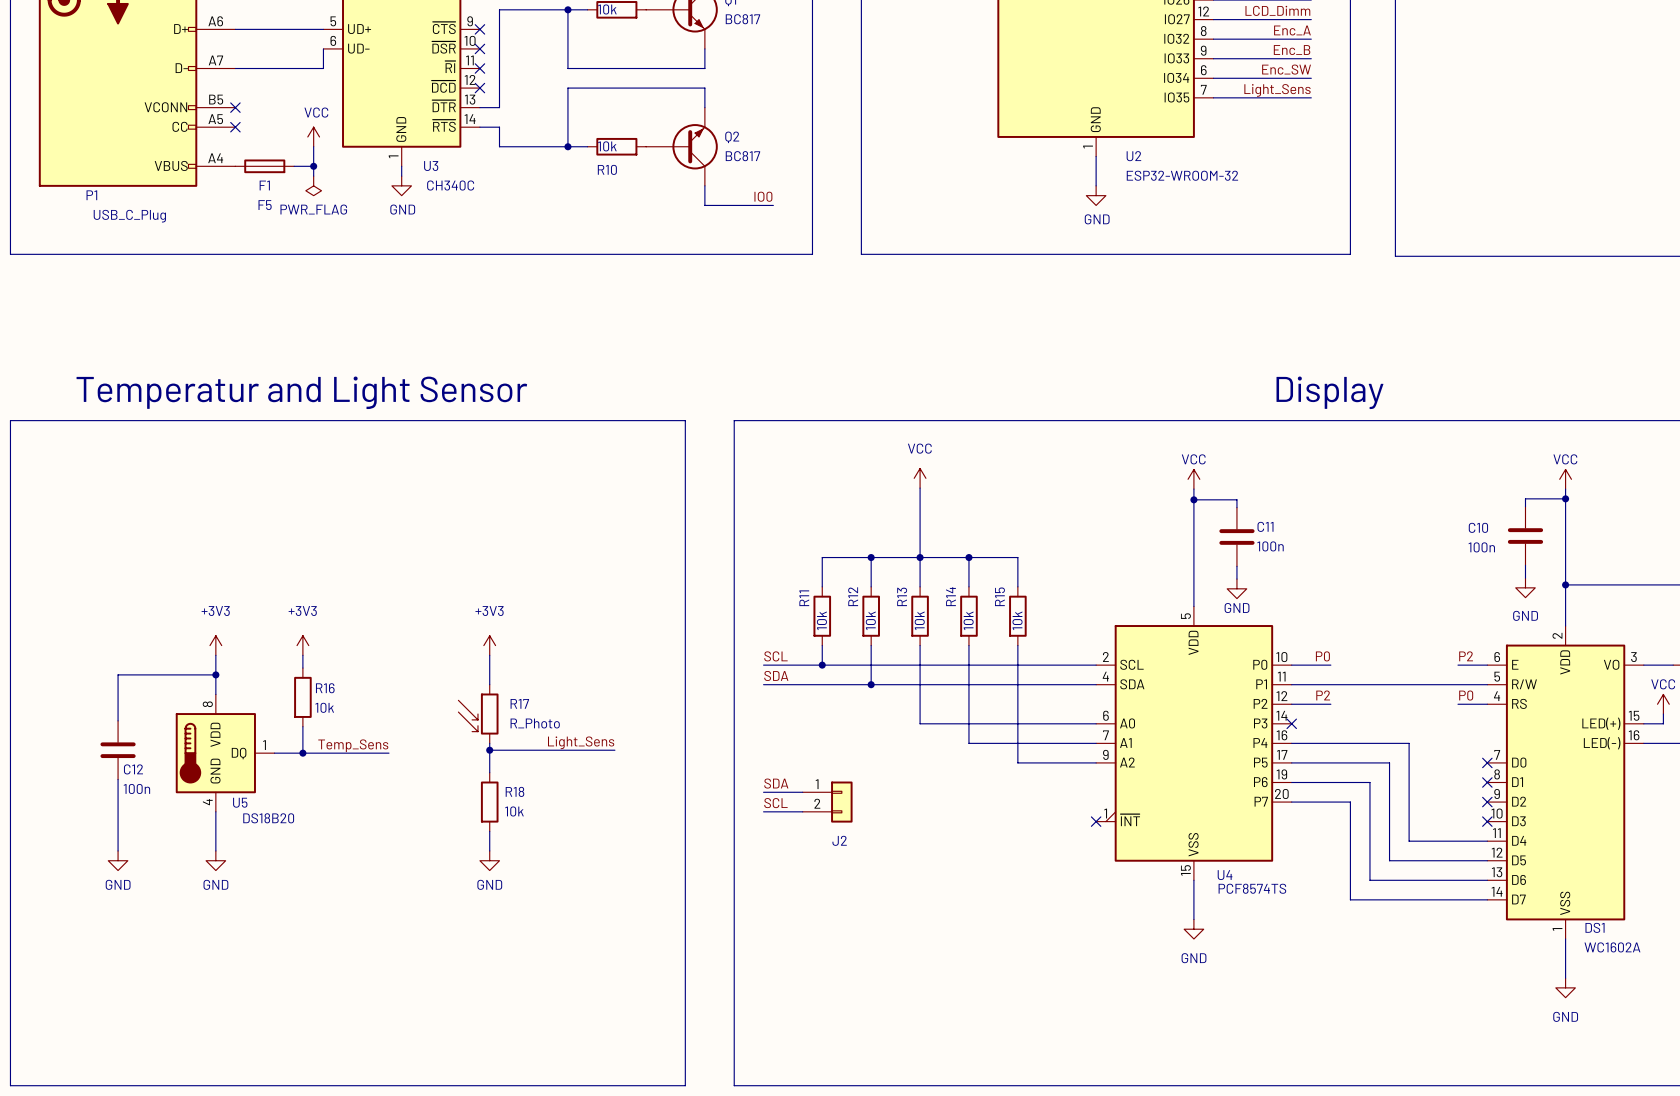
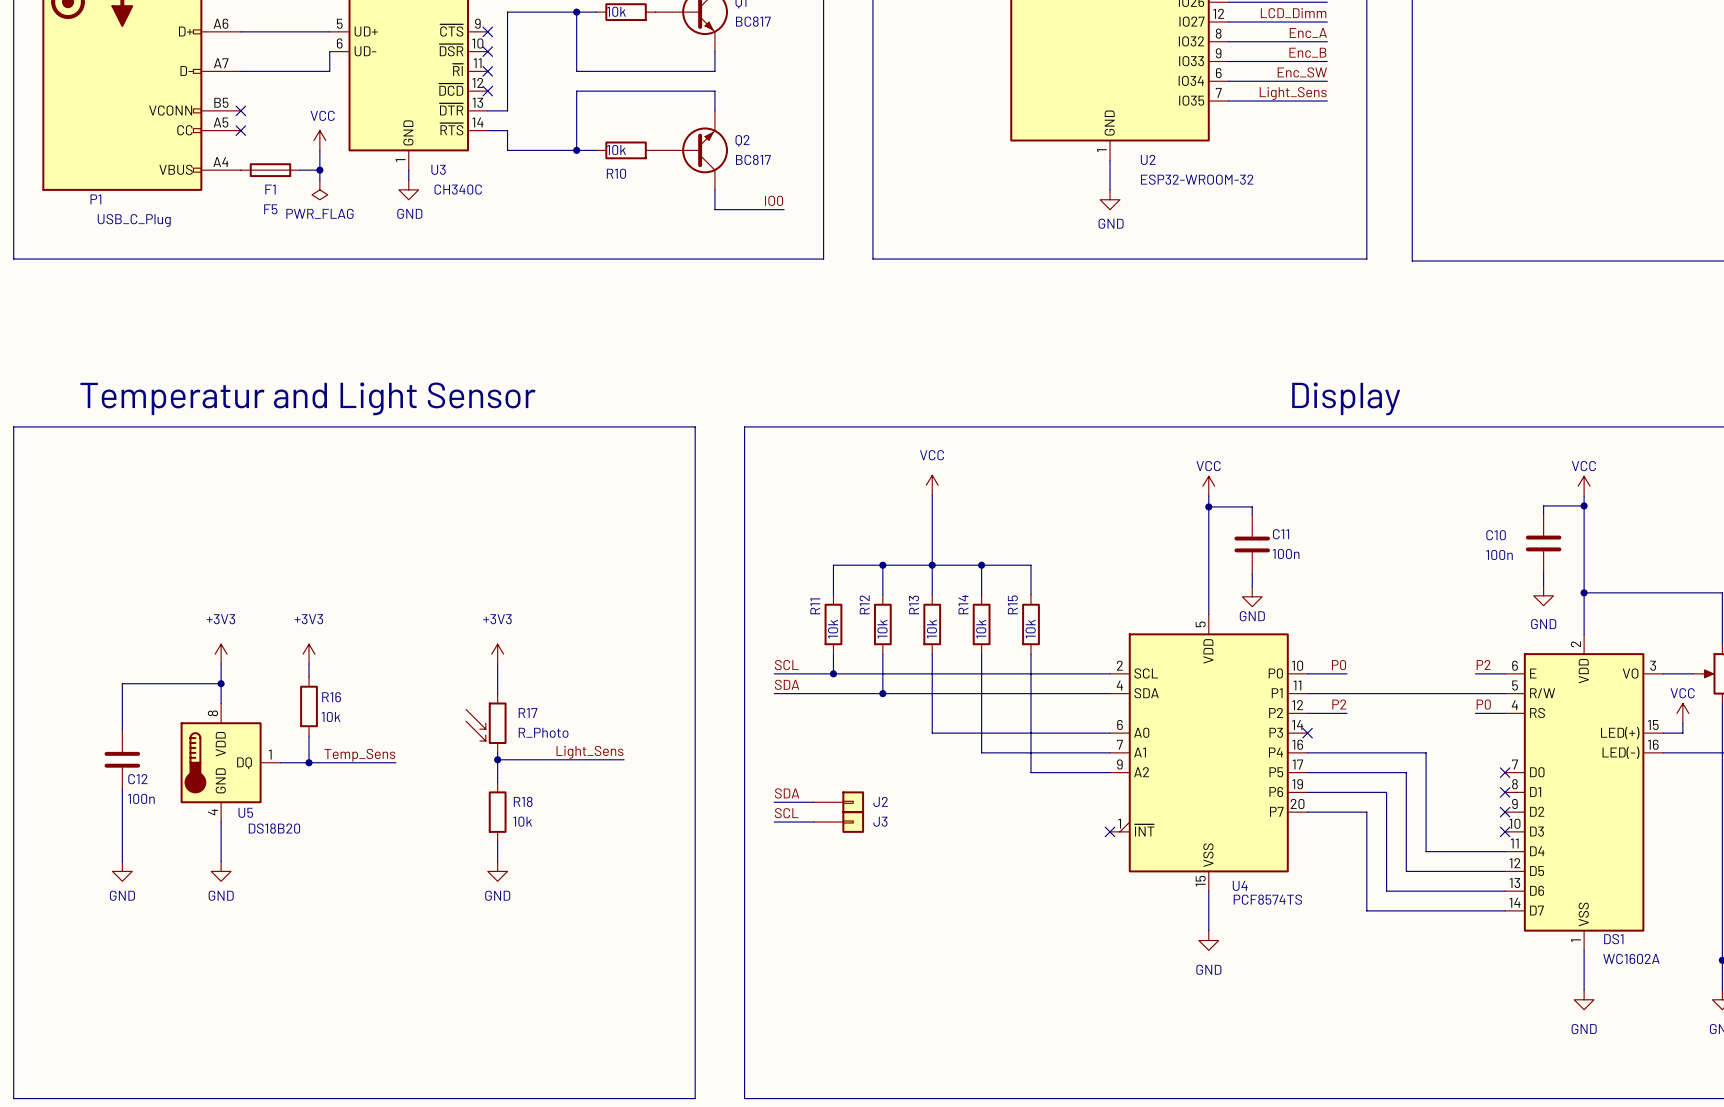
J2 symbol: [802, 781, 853, 823] -> [813, 791, 865, 814]
J3: none -> (838, 822)
J2 name position: J2 (839, 840) -> J2 (880, 801)

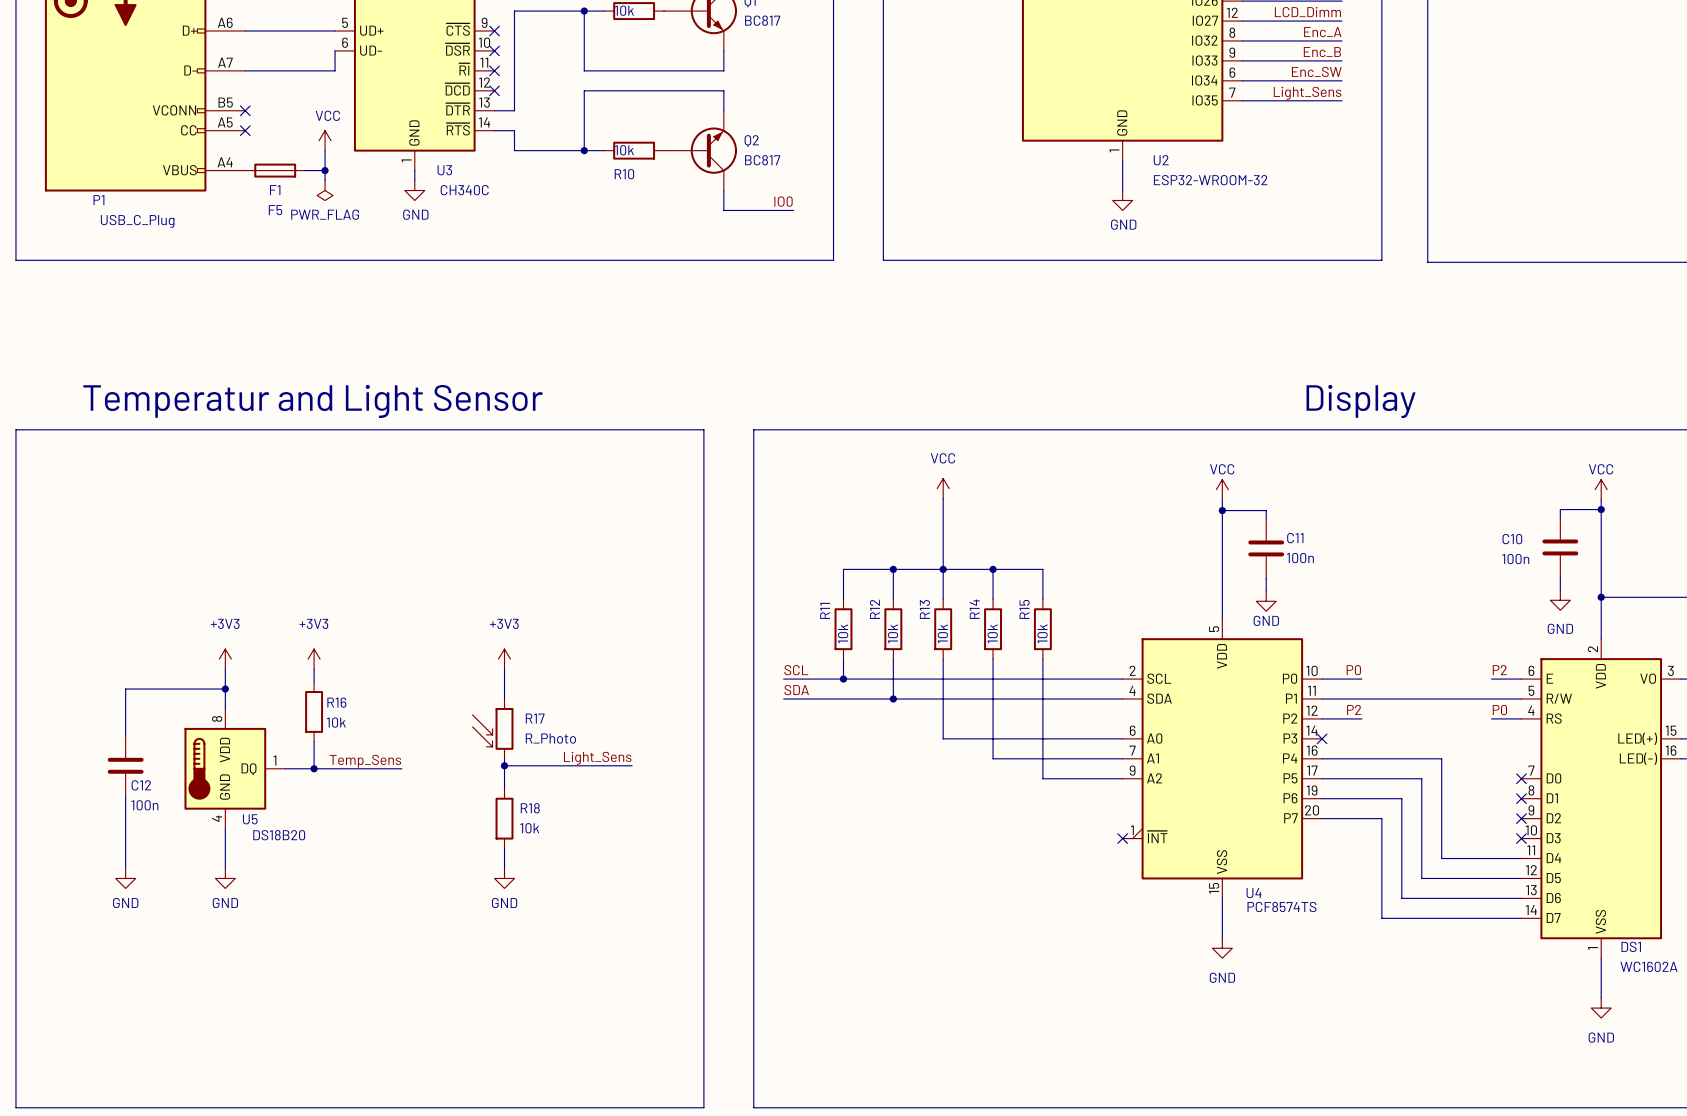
label: SDA (787, 793) -> none
wire: (774, 802) (813, 802) -> none
J2: (838, 802) -> none
label: SCL (786, 813) -> none
wire: (774, 822) (813, 822) -> none
J3: (838, 822) -> none

